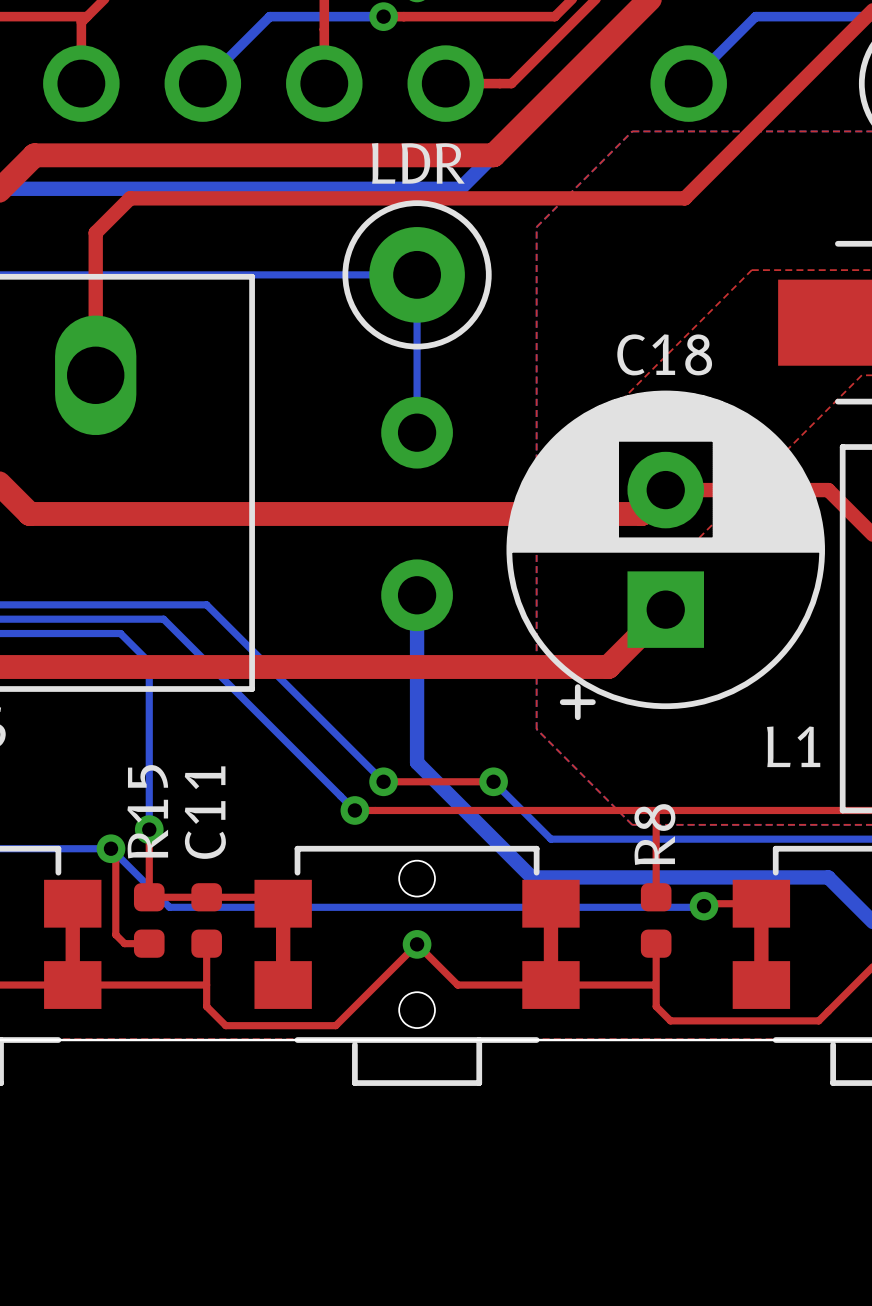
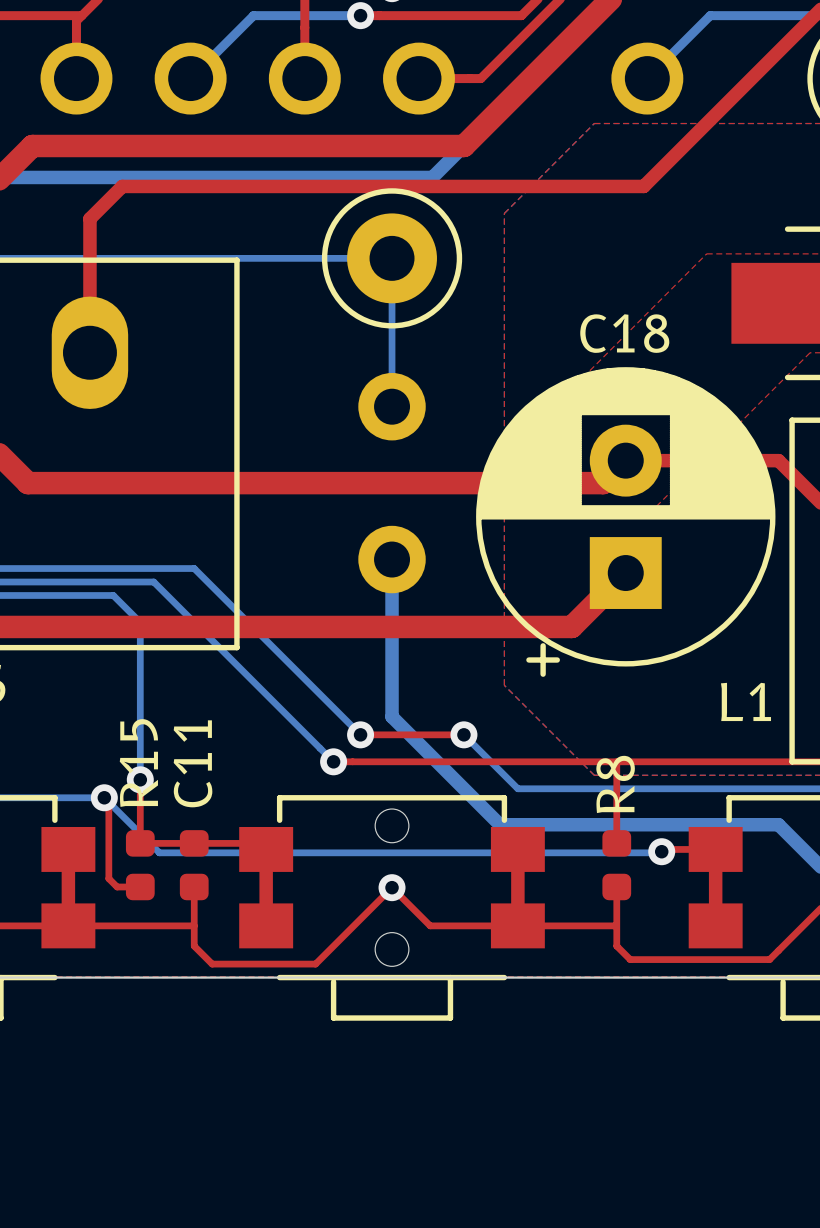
text: LDR (418, 163) -> none

